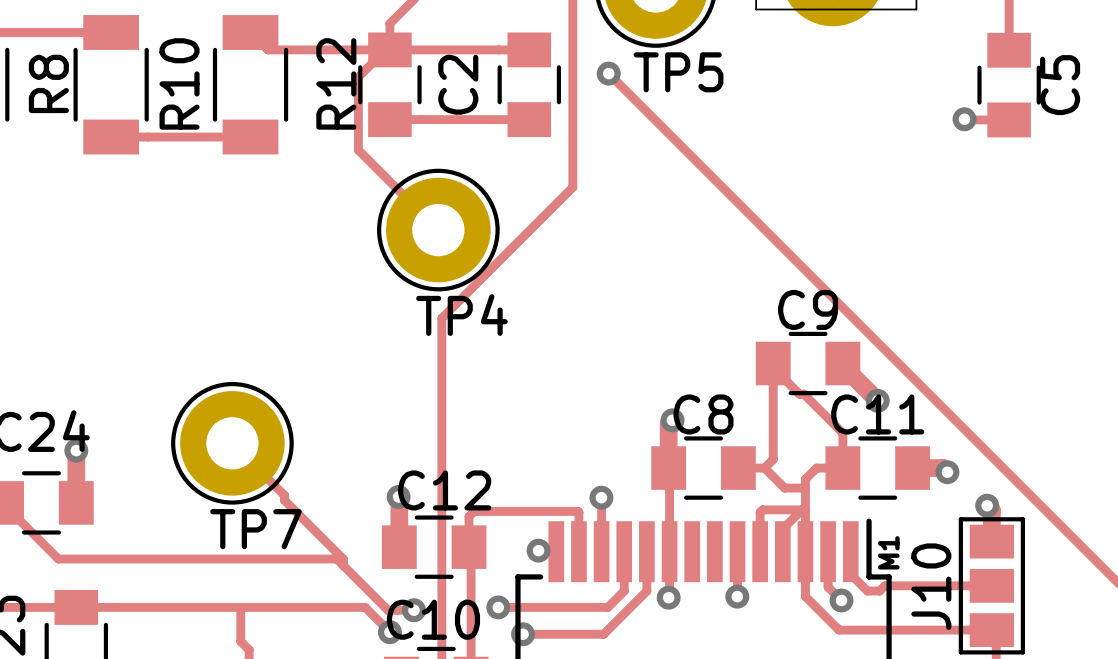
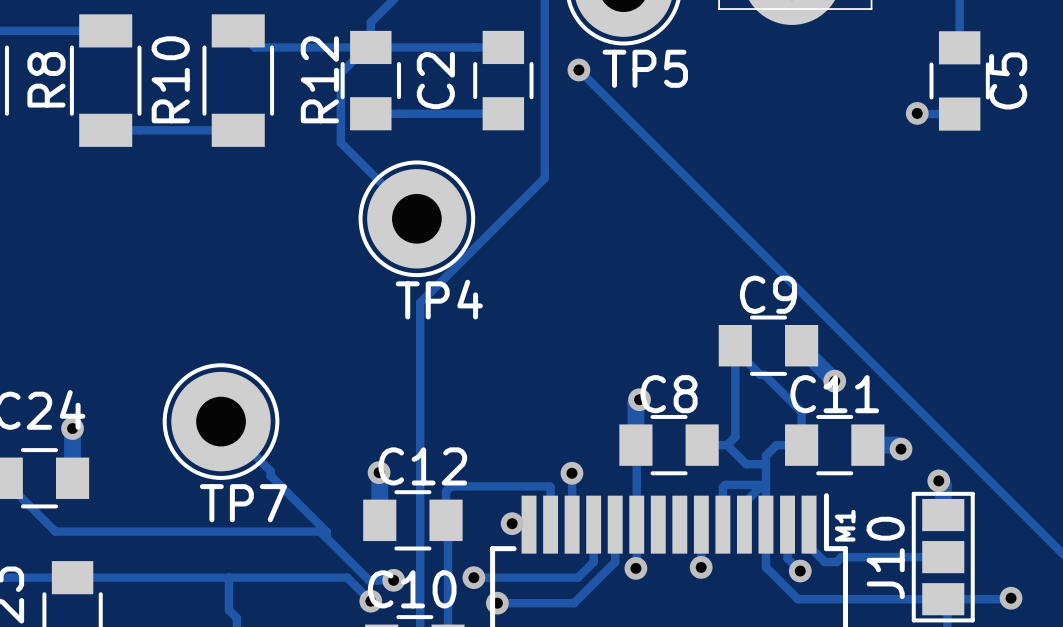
track: none -> (1011, 598) (943, 599)
via: none -> (1011, 598)

